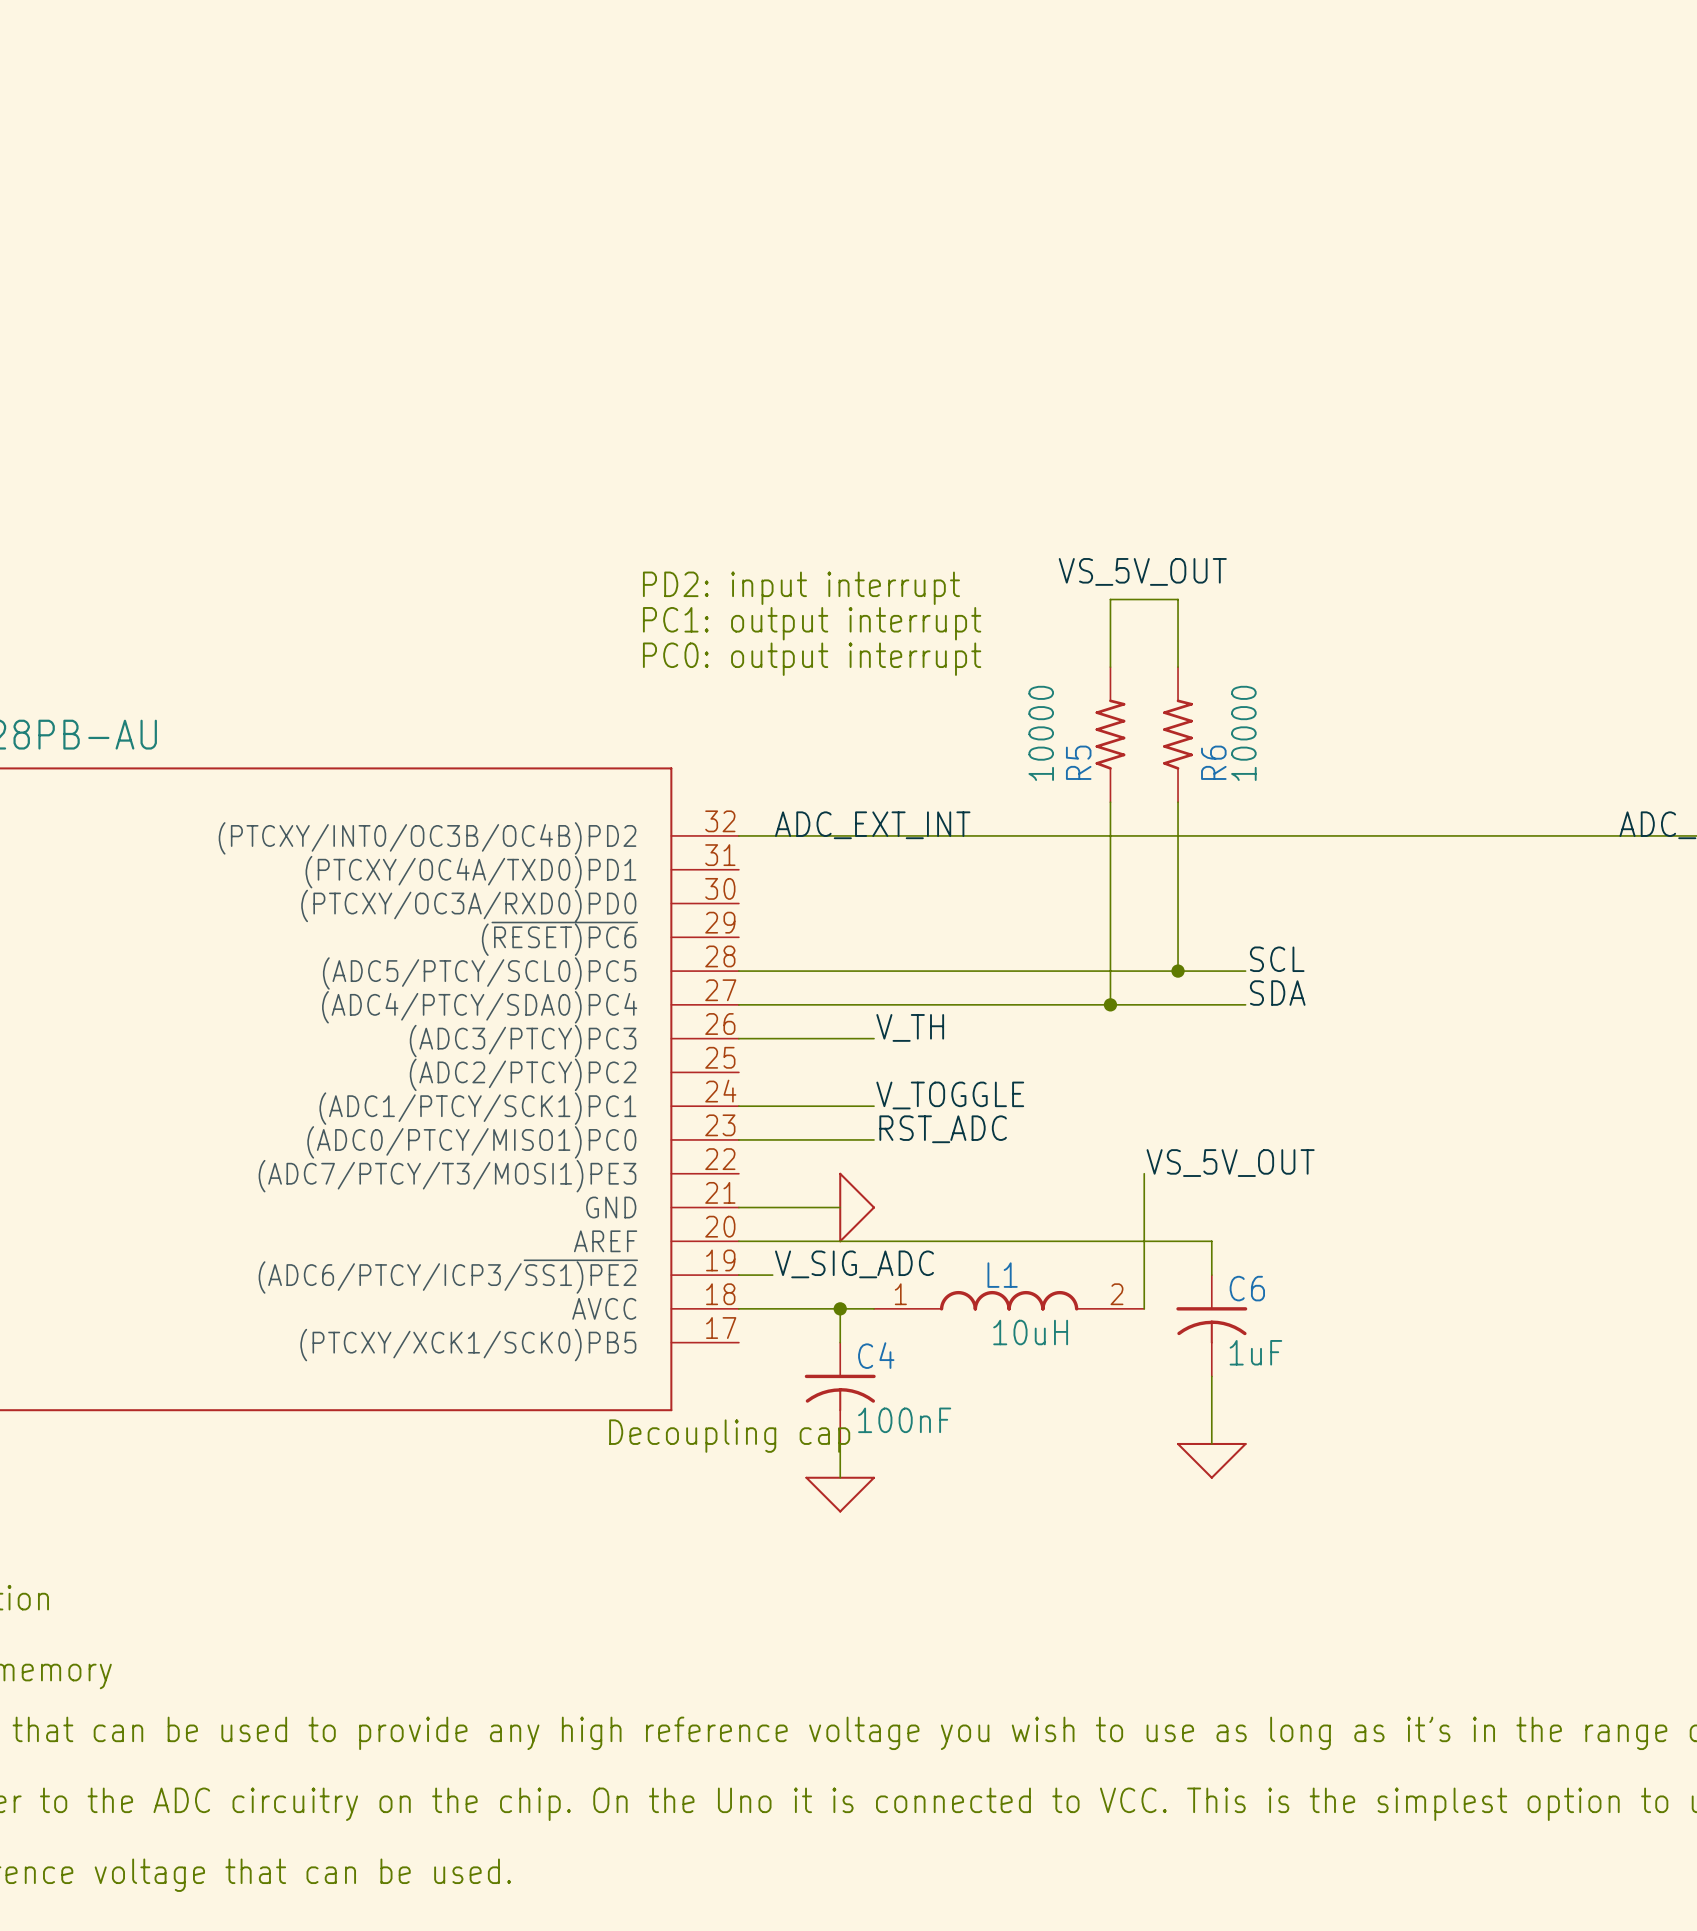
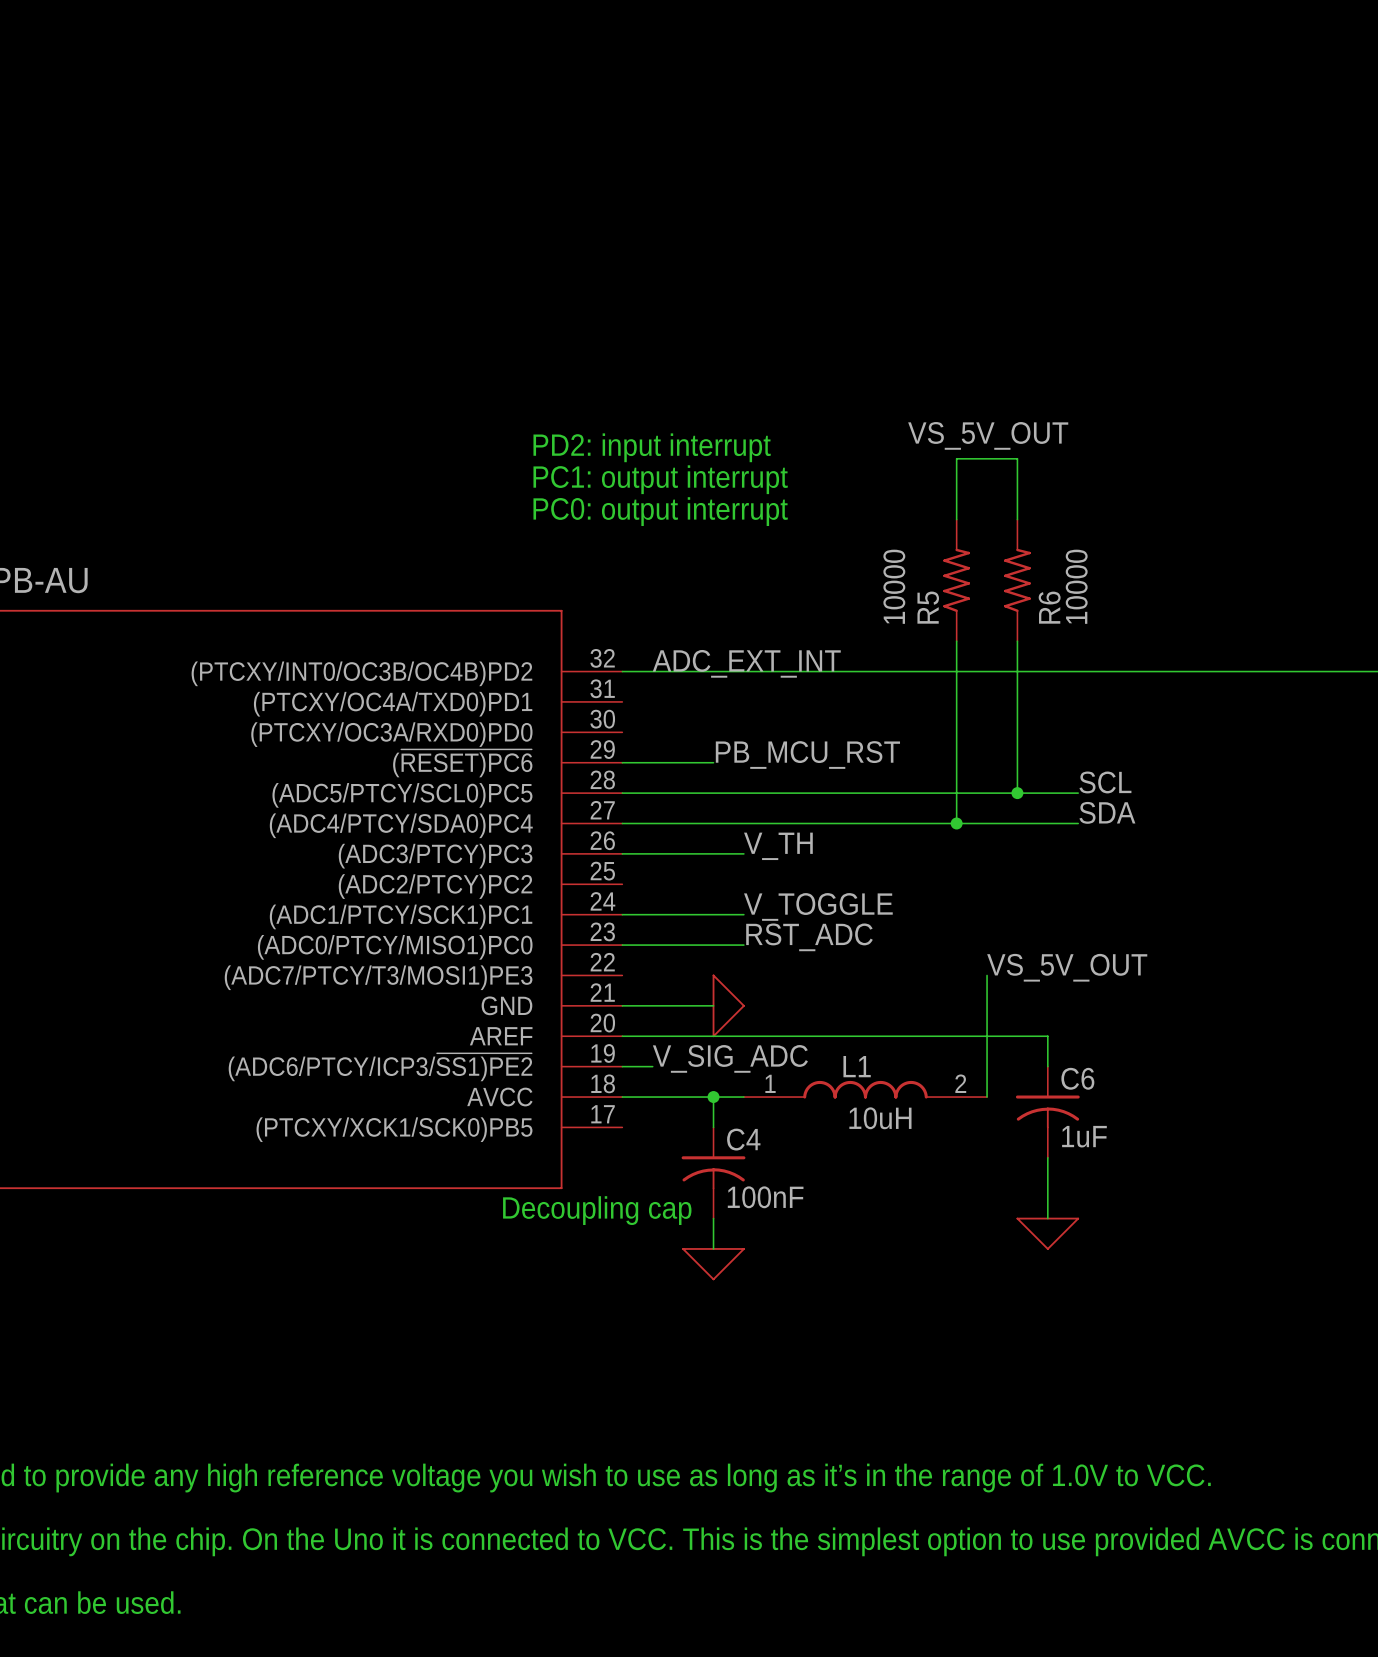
label: none -> PB_MCU_RST (807, 755)
wire: none -> (622, 762) (713, 762)

